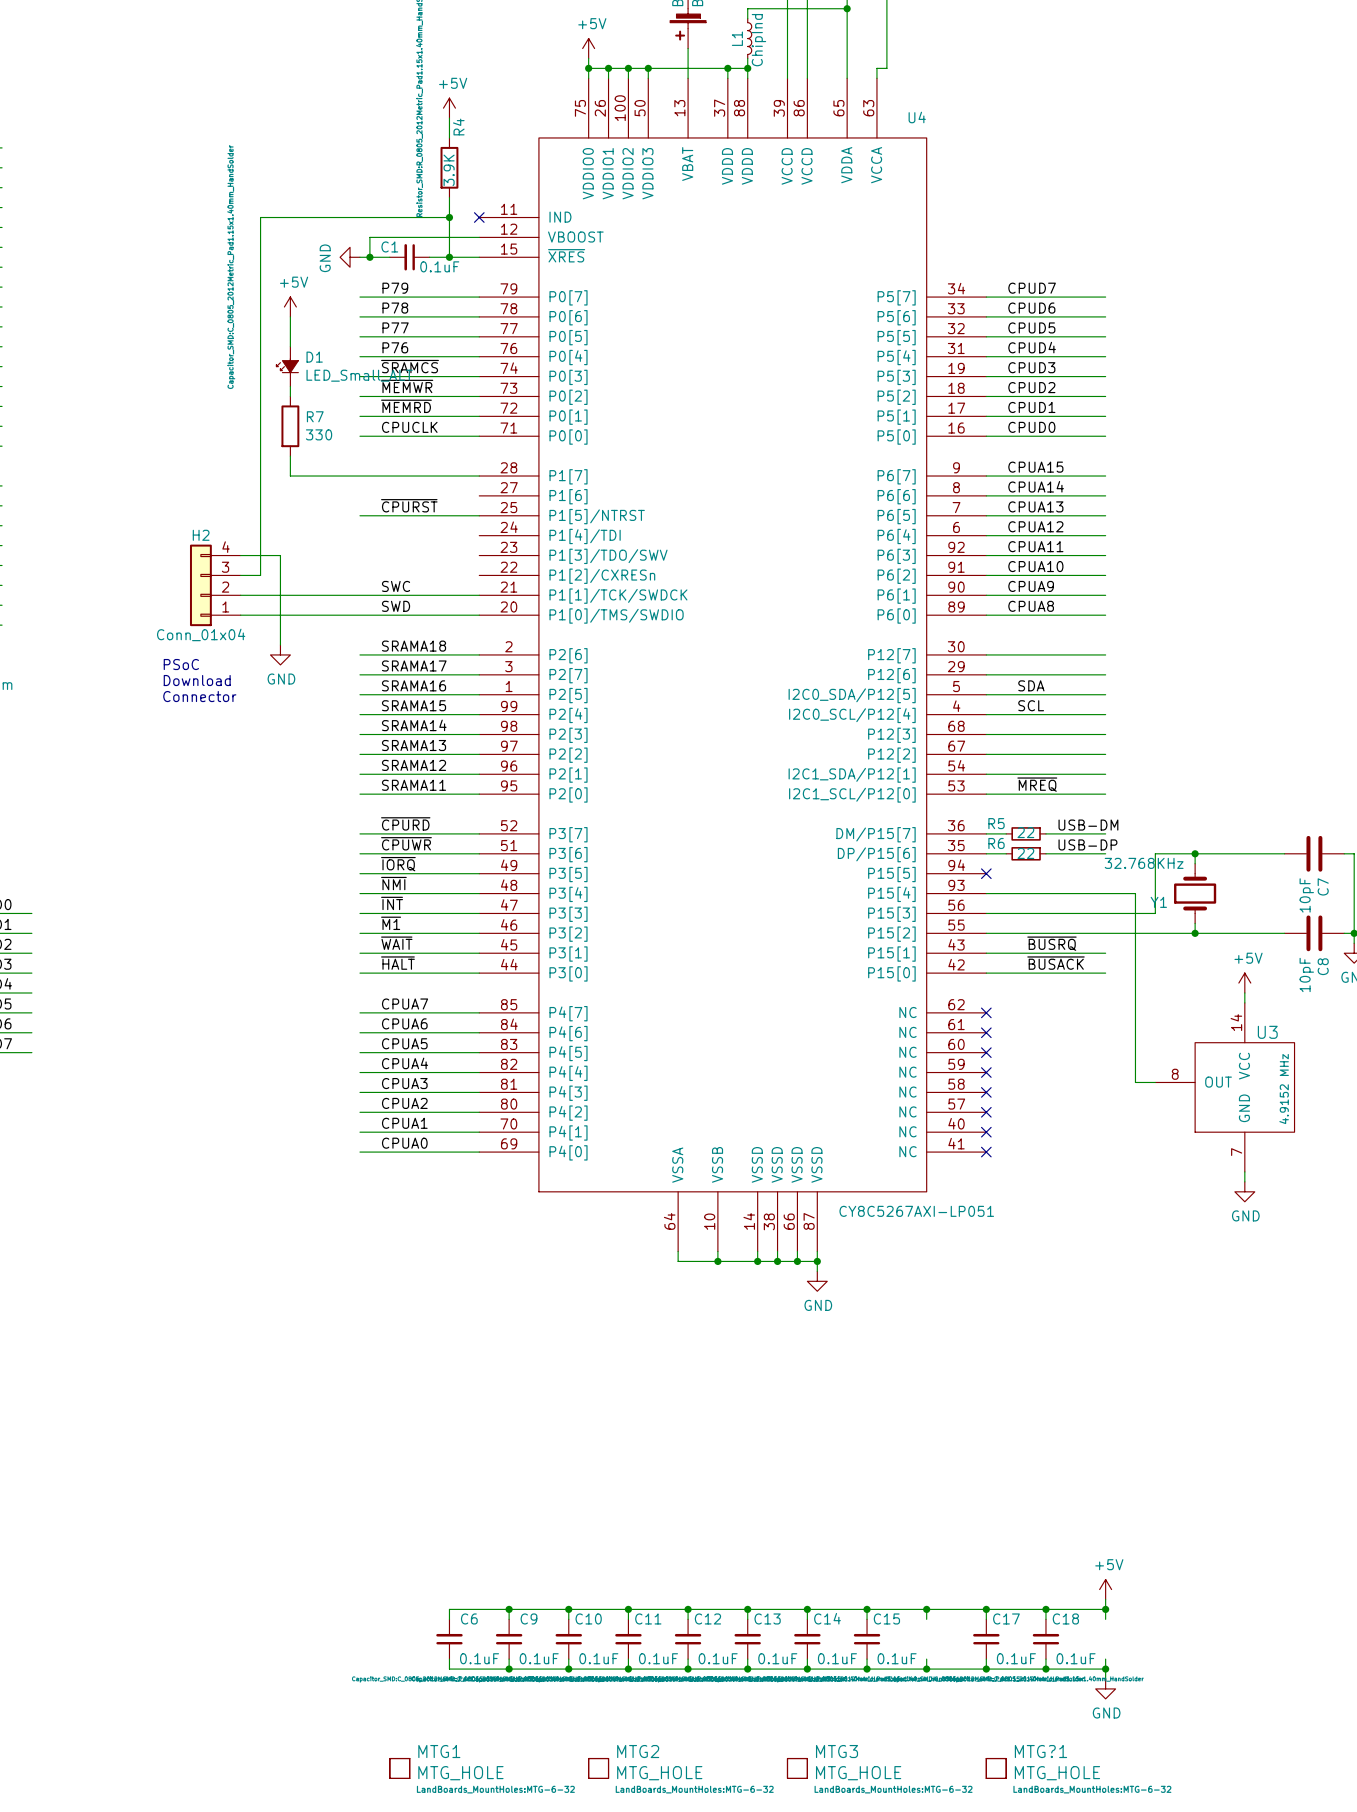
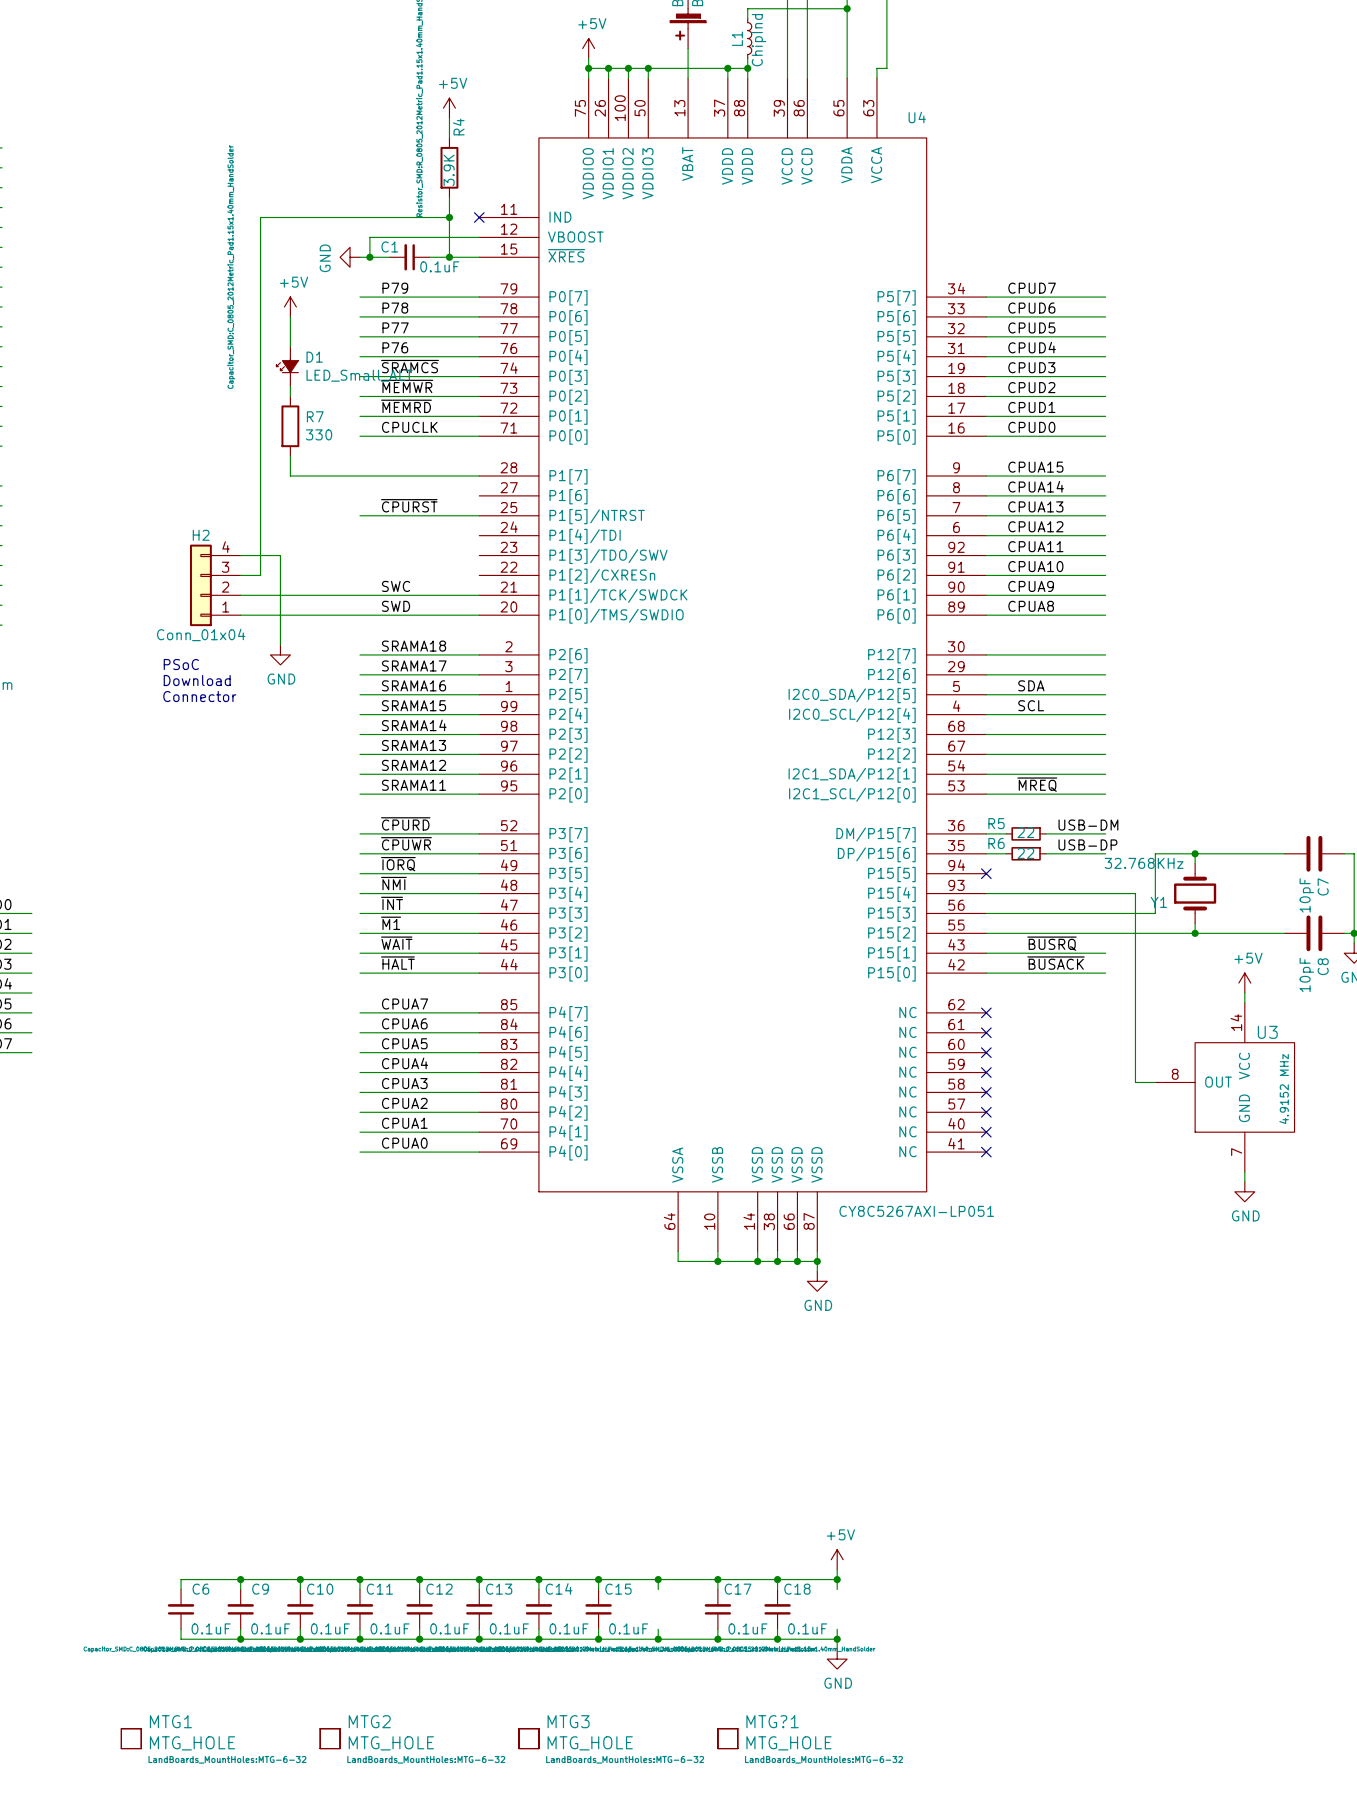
power symbol: none -> +5V (837, 1559)
wire: none -> (837, 1569) (837, 1589)
wire: none -> (240, 1579) (240, 1589)
junction: none -> (240, 1579)
wire: none -> (300, 1579) (300, 1589)
junction: none -> (300, 1579)
junction: none -> (359, 1579)
junction: none -> (419, 1579)
junction: none -> (479, 1579)
junction: none -> (538, 1579)
junction: none -> (598, 1579)
junction: none -> (658, 1579)
junction: none -> (717, 1579)
junction: none -> (777, 1579)
wire: none -> (837, 1579) (181, 1579) (181, 1589)
junction: none -> (837, 1579)
power symbol: +5V (1105, 1589) -> none
wire: (1105, 1599) (1105, 1619) -> none
wire: (509, 1609) (509, 1619) -> (359, 1579) (359, 1589)
junction: (509, 1609) -> none
wire: (568, 1609) (568, 1619) -> (419, 1579) (419, 1589)
junction: (568, 1609) -> none
wire: (628, 1609) (628, 1619) -> (479, 1579) (479, 1589)
junction: (628, 1609) -> none
wire: (688, 1609) (688, 1619) -> (538, 1579) (538, 1589)
junction: (688, 1609) -> none
wire: (747, 1609) (747, 1619) -> (598, 1579) (598, 1589)
junction: (747, 1609) -> none
wire: (807, 1609) (807, 1619) -> (658, 1579) (658, 1589)
junction: (807, 1609) -> none
wire: (867, 1609) (867, 1619) -> (717, 1579) (717, 1589)
junction: (867, 1609) -> none
wire: (926, 1609) (926, 1619) -> (777, 1579) (777, 1589)
junction: (926, 1609) -> none
wire: (986, 1609) (986, 1619) -> none
junction: (986, 1609) -> none
wire: (1045, 1609) (1045, 1619) -> none
junction: (1045, 1609) -> none
wire: (1105, 1609) (449, 1609) (449, 1619) -> none
junction: (1105, 1609) -> none
wire: none -> (181, 1629) (181, 1639) (837, 1639)
wire: none -> (240, 1629) (240, 1639)
wire: none -> (300, 1629) (300, 1639)
wire: none -> (837, 1629) (837, 1649)
junction: none -> (240, 1639)
junction: none -> (300, 1639)
junction: none -> (359, 1639)
junction: none -> (419, 1639)
C6 position: (449, 1639) -> (181, 1609)
junction: none -> (479, 1639)
C9 position: (509, 1639) -> (240, 1609)
junction: none -> (538, 1639)
C10 position: (568, 1639) -> (300, 1609)
junction: none -> (598, 1639)
C11 position: (628, 1639) -> (359, 1609)
junction: none -> (658, 1639)
C12 position: (688, 1639) -> (419, 1609)
junction: none -> (717, 1639)
C13 position: (747, 1639) -> (479, 1609)
junction: none -> (777, 1639)
C14 position: (807, 1639) -> (538, 1609)
junction: none -> (837, 1639)
C15 position: (867, 1639) -> (598, 1609)
C17 position: (986, 1639) -> (717, 1609)
C18 position: (1045, 1639) -> (777, 1609)
wire: (449, 1659) (449, 1669) (1105, 1669) -> none
wire: (509, 1659) (509, 1669) -> (359, 1629) (359, 1639)
wire: (568, 1659) (568, 1669) -> (419, 1629) (419, 1639)
wire: (628, 1659) (628, 1669) -> (479, 1629) (479, 1639)
wire: (688, 1659) (688, 1669) -> (538, 1629) (538, 1639)
wire: (747, 1659) (747, 1669) -> (598, 1629) (598, 1639)
wire: (807, 1659) (807, 1669) -> (658, 1629) (658, 1639)
power symbol: none -> GND (837, 1659)
wire: (867, 1659) (867, 1669) -> (717, 1629) (717, 1639)
wire: (926, 1659) (926, 1669) -> (777, 1629) (777, 1639)
wire: (986, 1659) (986, 1669) -> none
wire: (1045, 1659) (1045, 1669) -> none
wire: (1105, 1659) (1105, 1679) -> none
junction: (509, 1669) -> none
junction: (568, 1669) -> none
junction: (628, 1669) -> none
junction: (688, 1669) -> none
junction: (747, 1669) -> none
junction: (807, 1669) -> none
junction: (867, 1669) -> none
junction: (926, 1669) -> none
junction: (986, 1669) -> none
junction: (1045, 1669) -> none
junction: (1105, 1669) -> none
power symbol: GND (1105, 1688) -> none
MTG1 position: (399, 1768) -> (131, 1738)
MTG2 position: (598, 1768) -> (330, 1738)
MTG3 position: (797, 1768) -> (528, 1738)
MTG?1 position: (996, 1768) -> (727, 1738)

